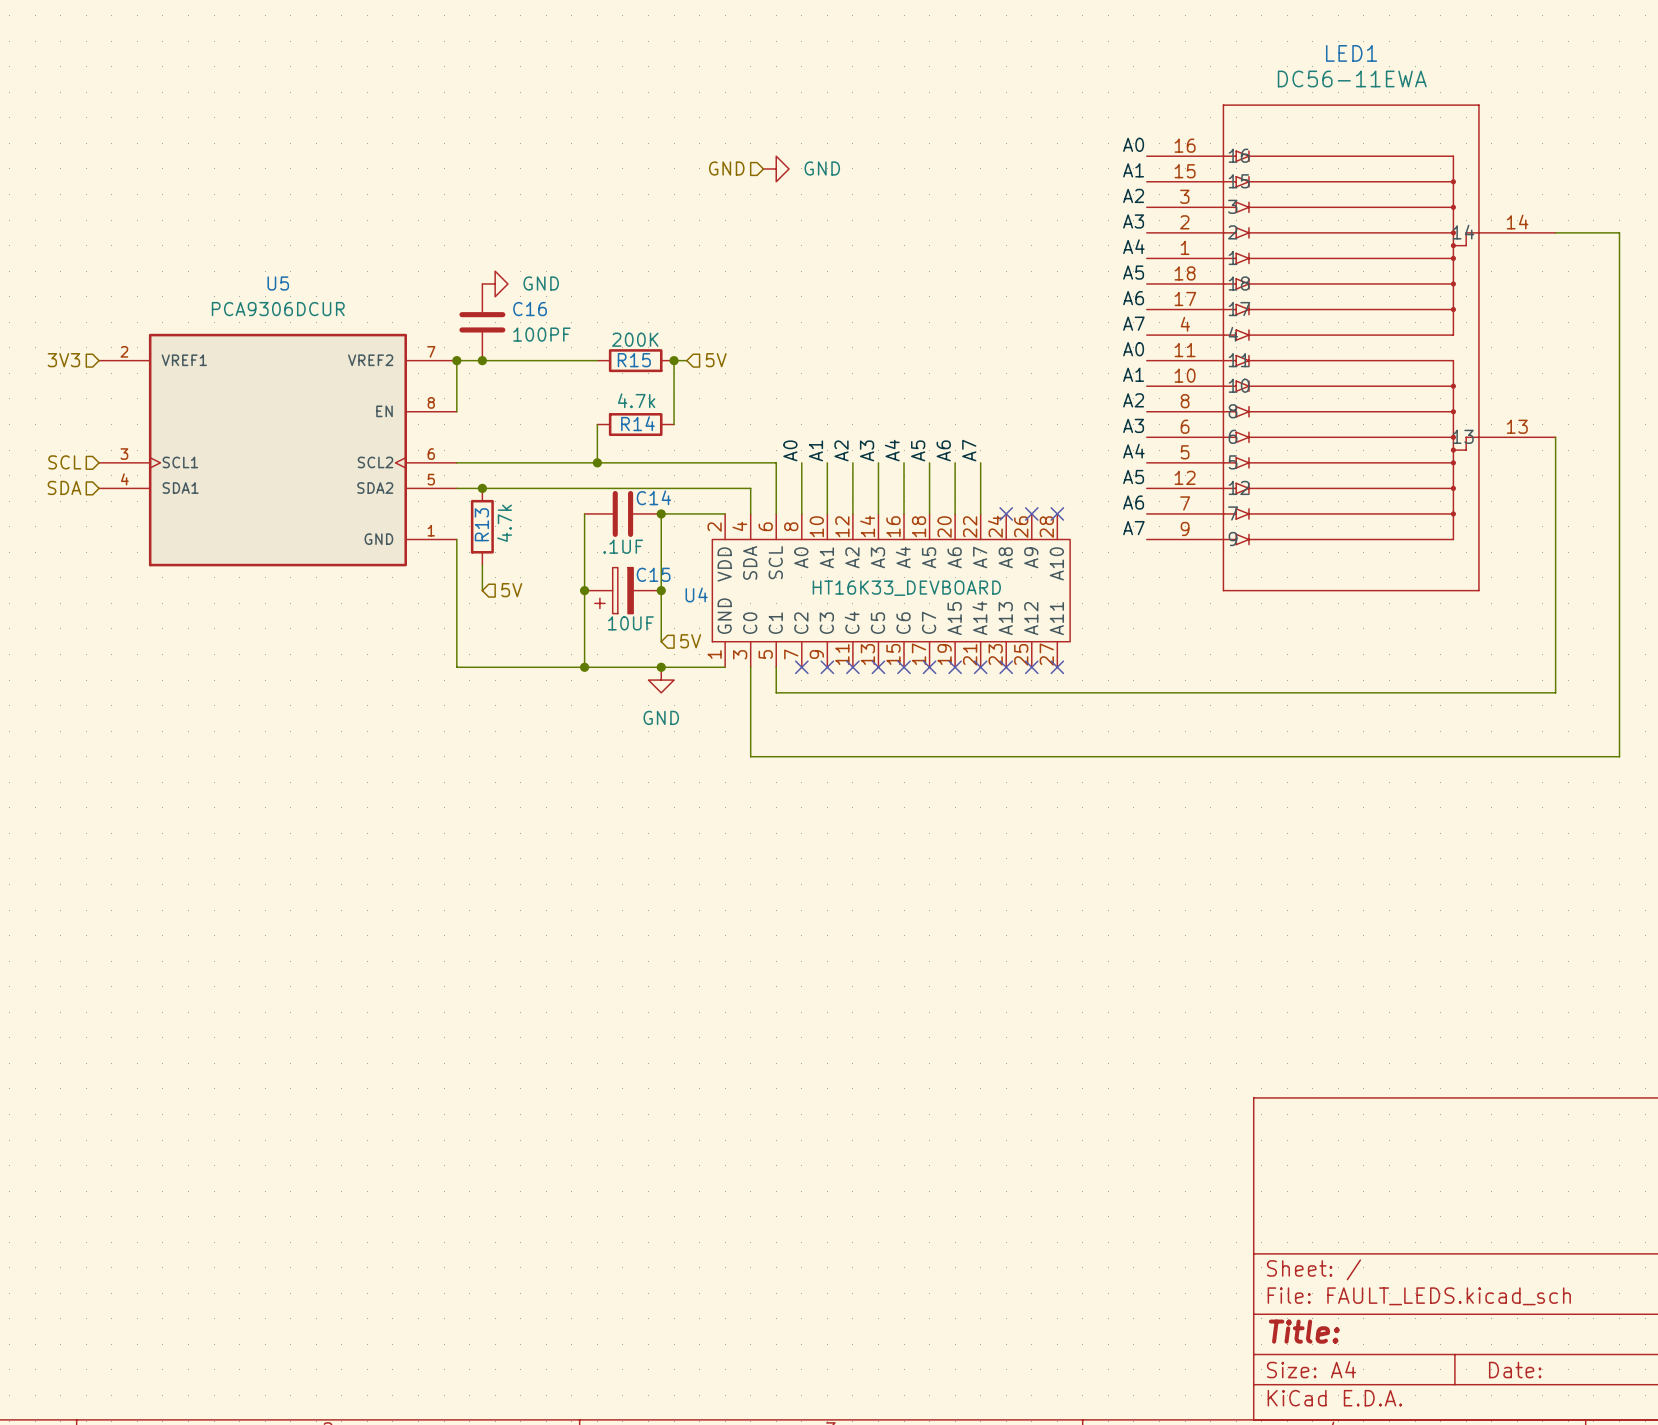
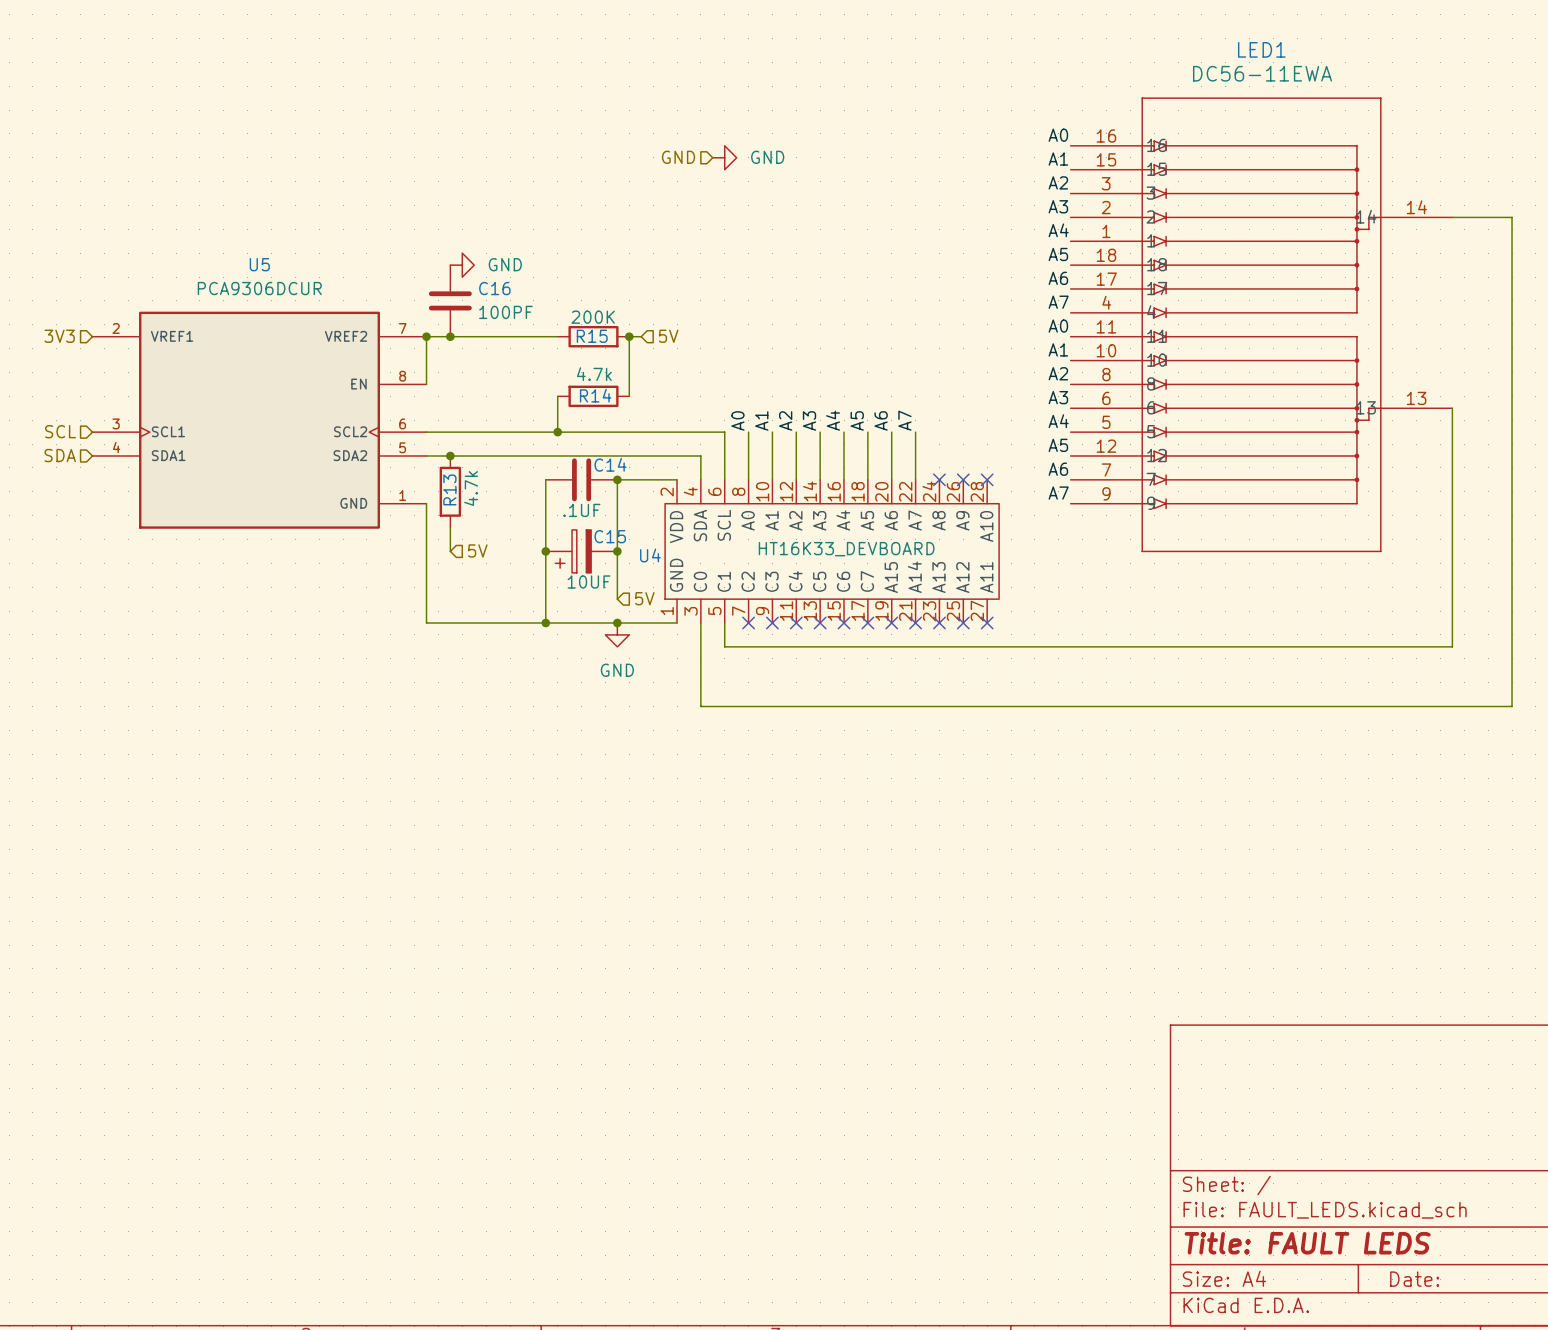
title block: Title: (1304, 1331) -> Title: FAULT LEDS (1307, 1243)

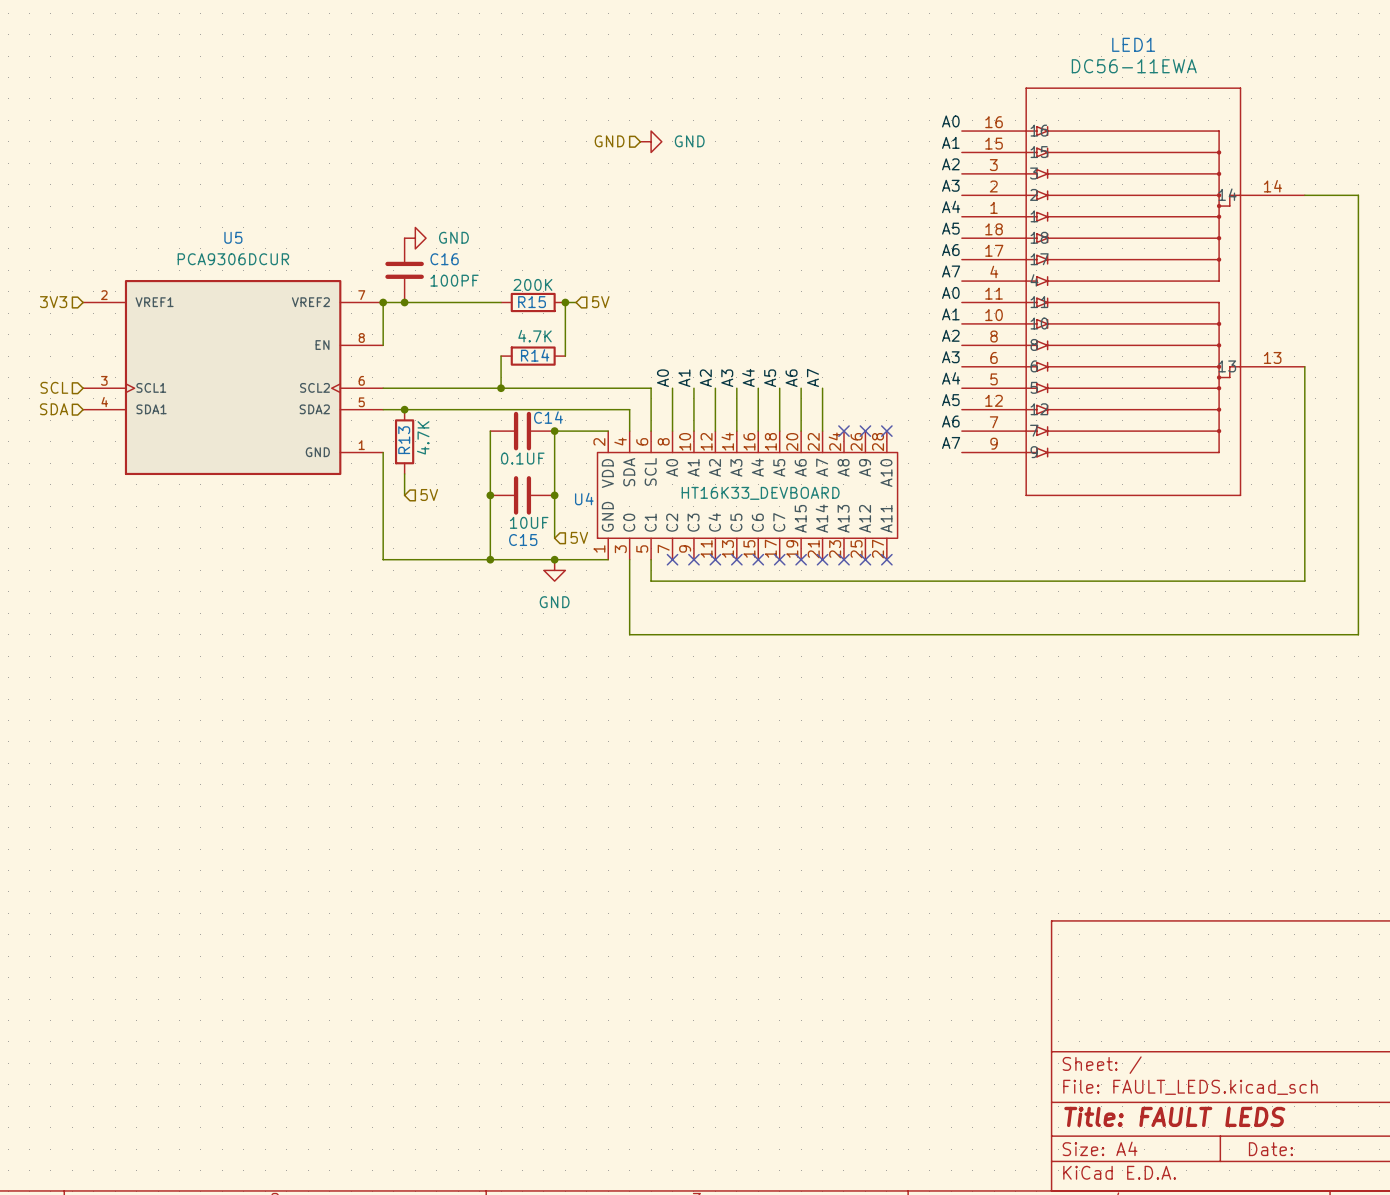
R14 value: 4.7k (594, 374) -> 4.7K (535, 336)
R13 value: 4.7k (471, 488) -> 4.7K (423, 437)
C14 value: .1UF (581, 510) -> 0.1UF (522, 458)
C15 symbol: [545, 529, 618, 573] -> [490, 476, 555, 515]
C15 name position: C15 (610, 536) -> C15 (523, 540)

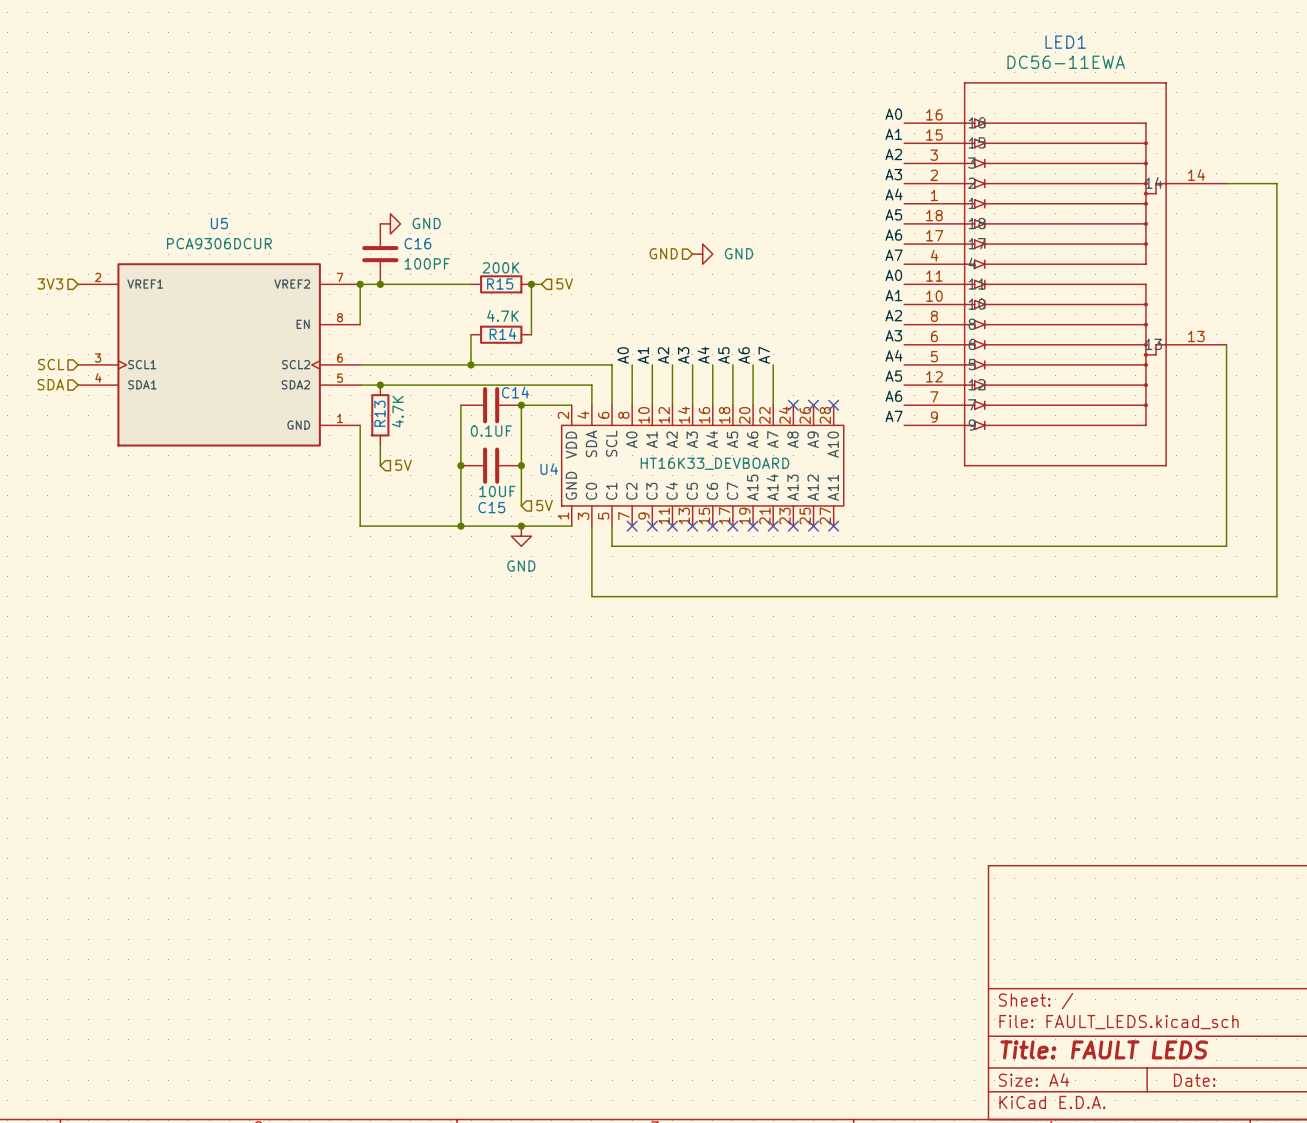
hierarchical label position: GND (609, 141) -> GND (663, 253)
power symbol position: GND (651, 141) -> GND (702, 254)

